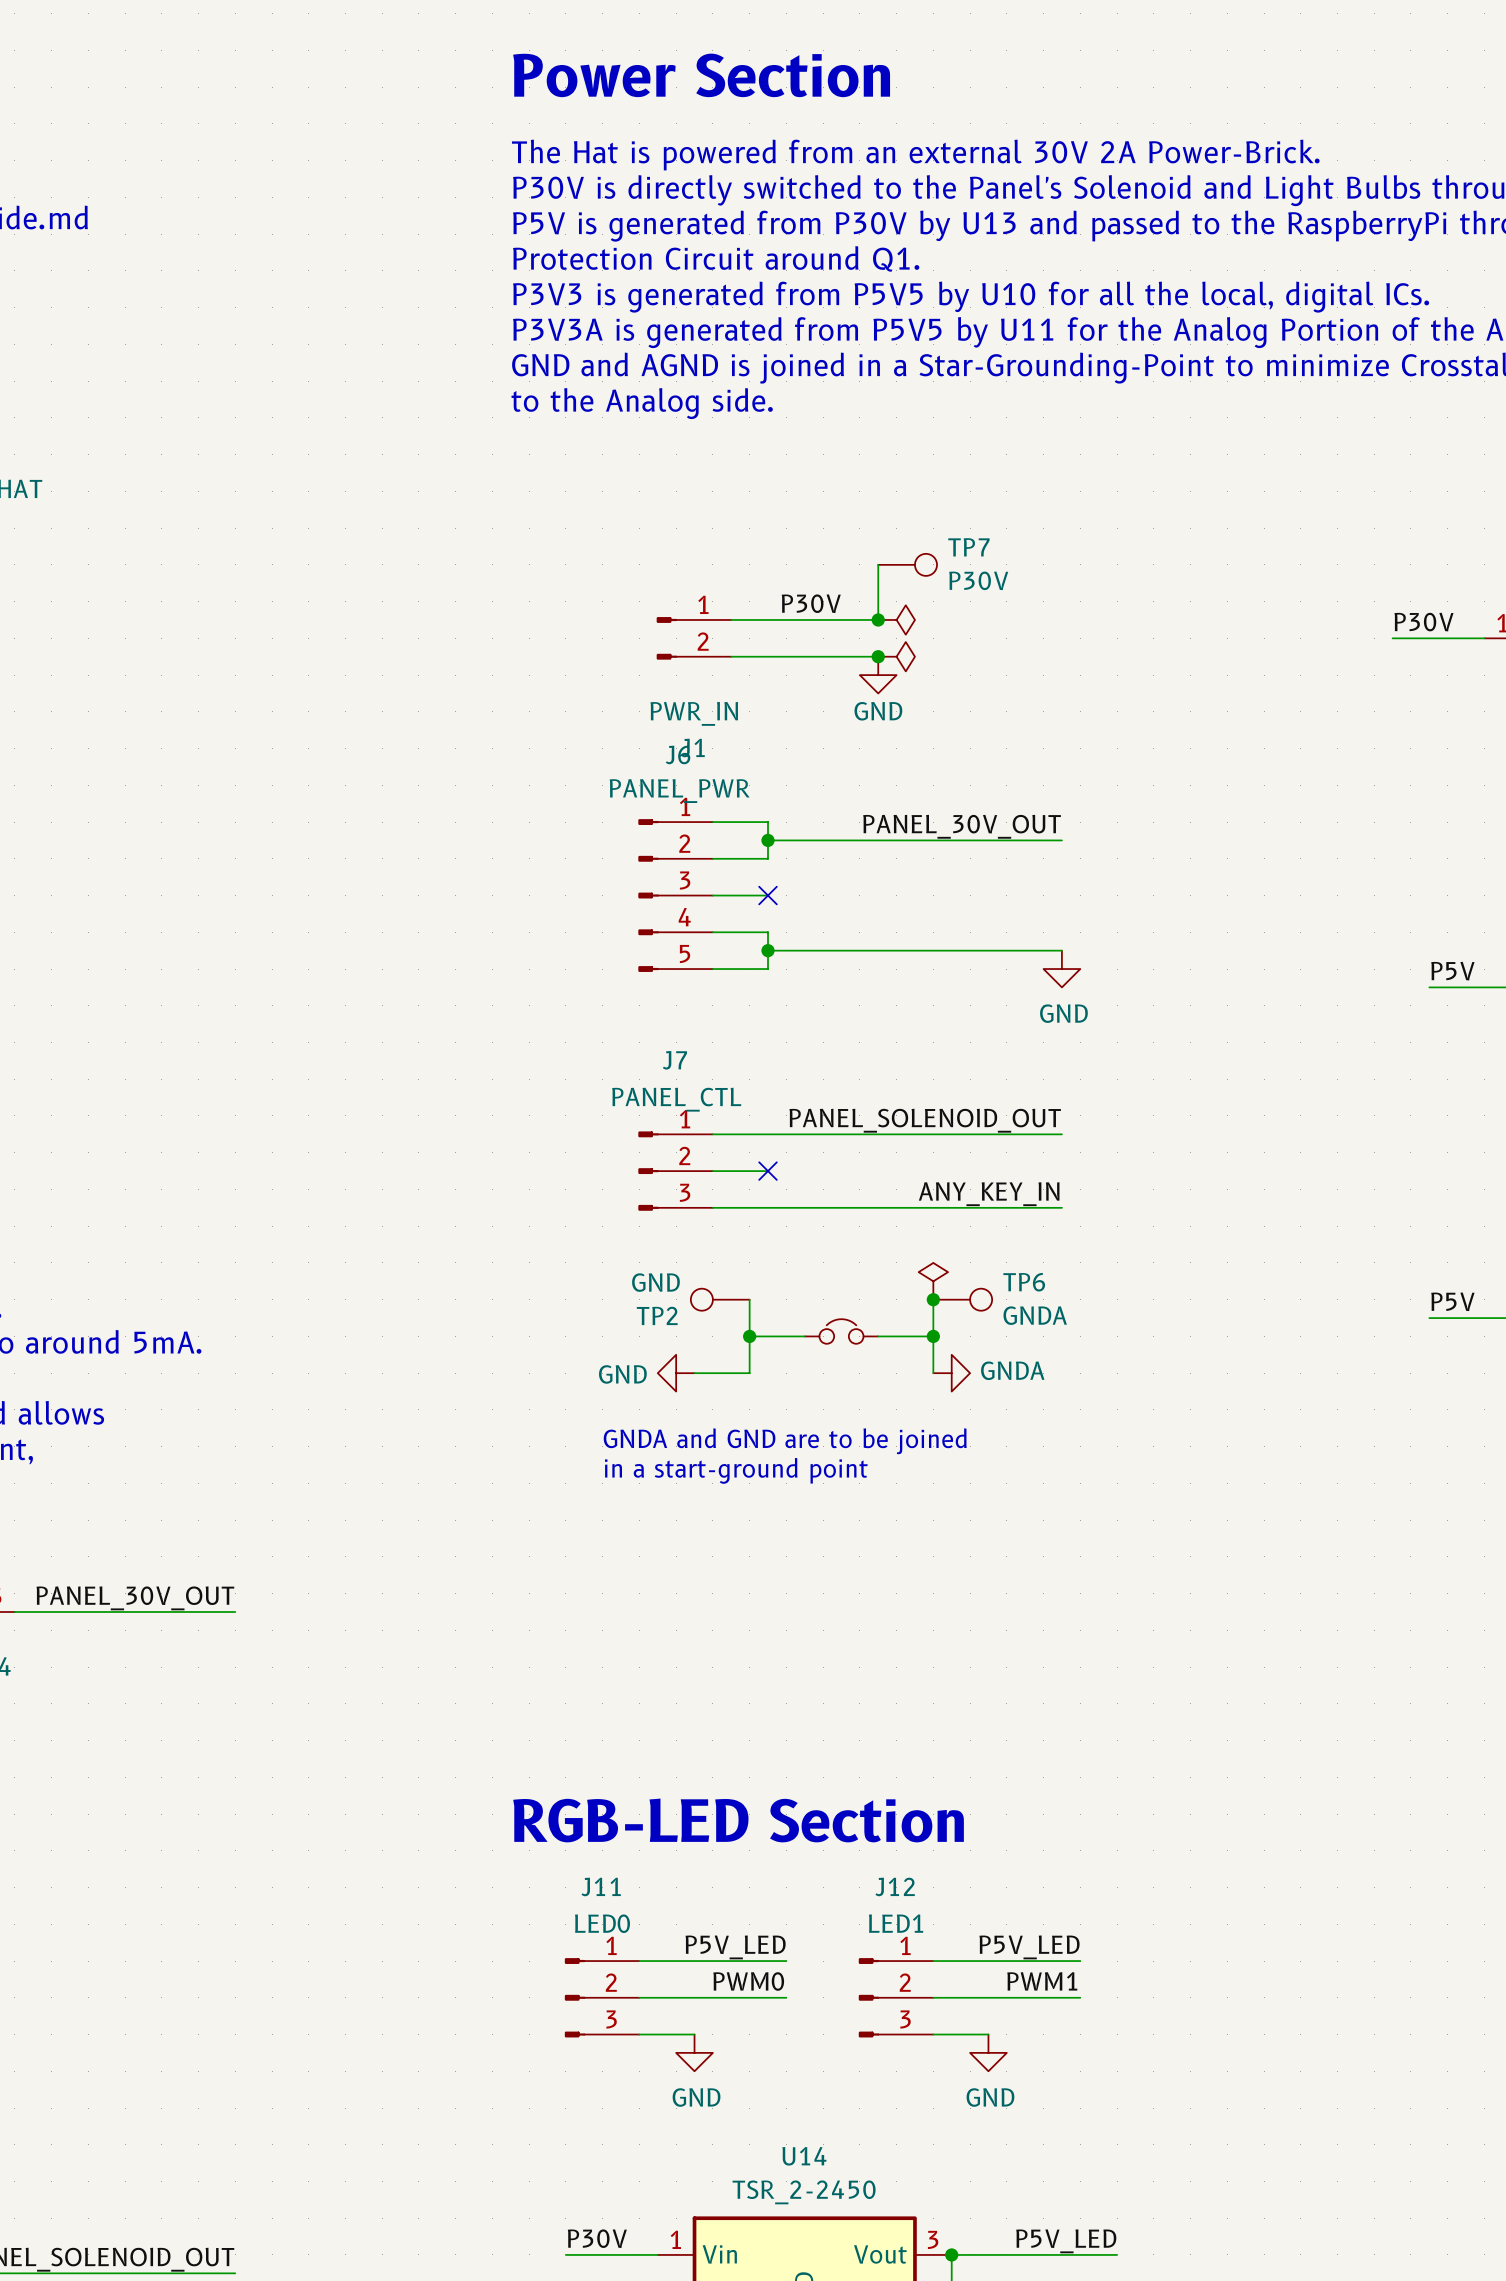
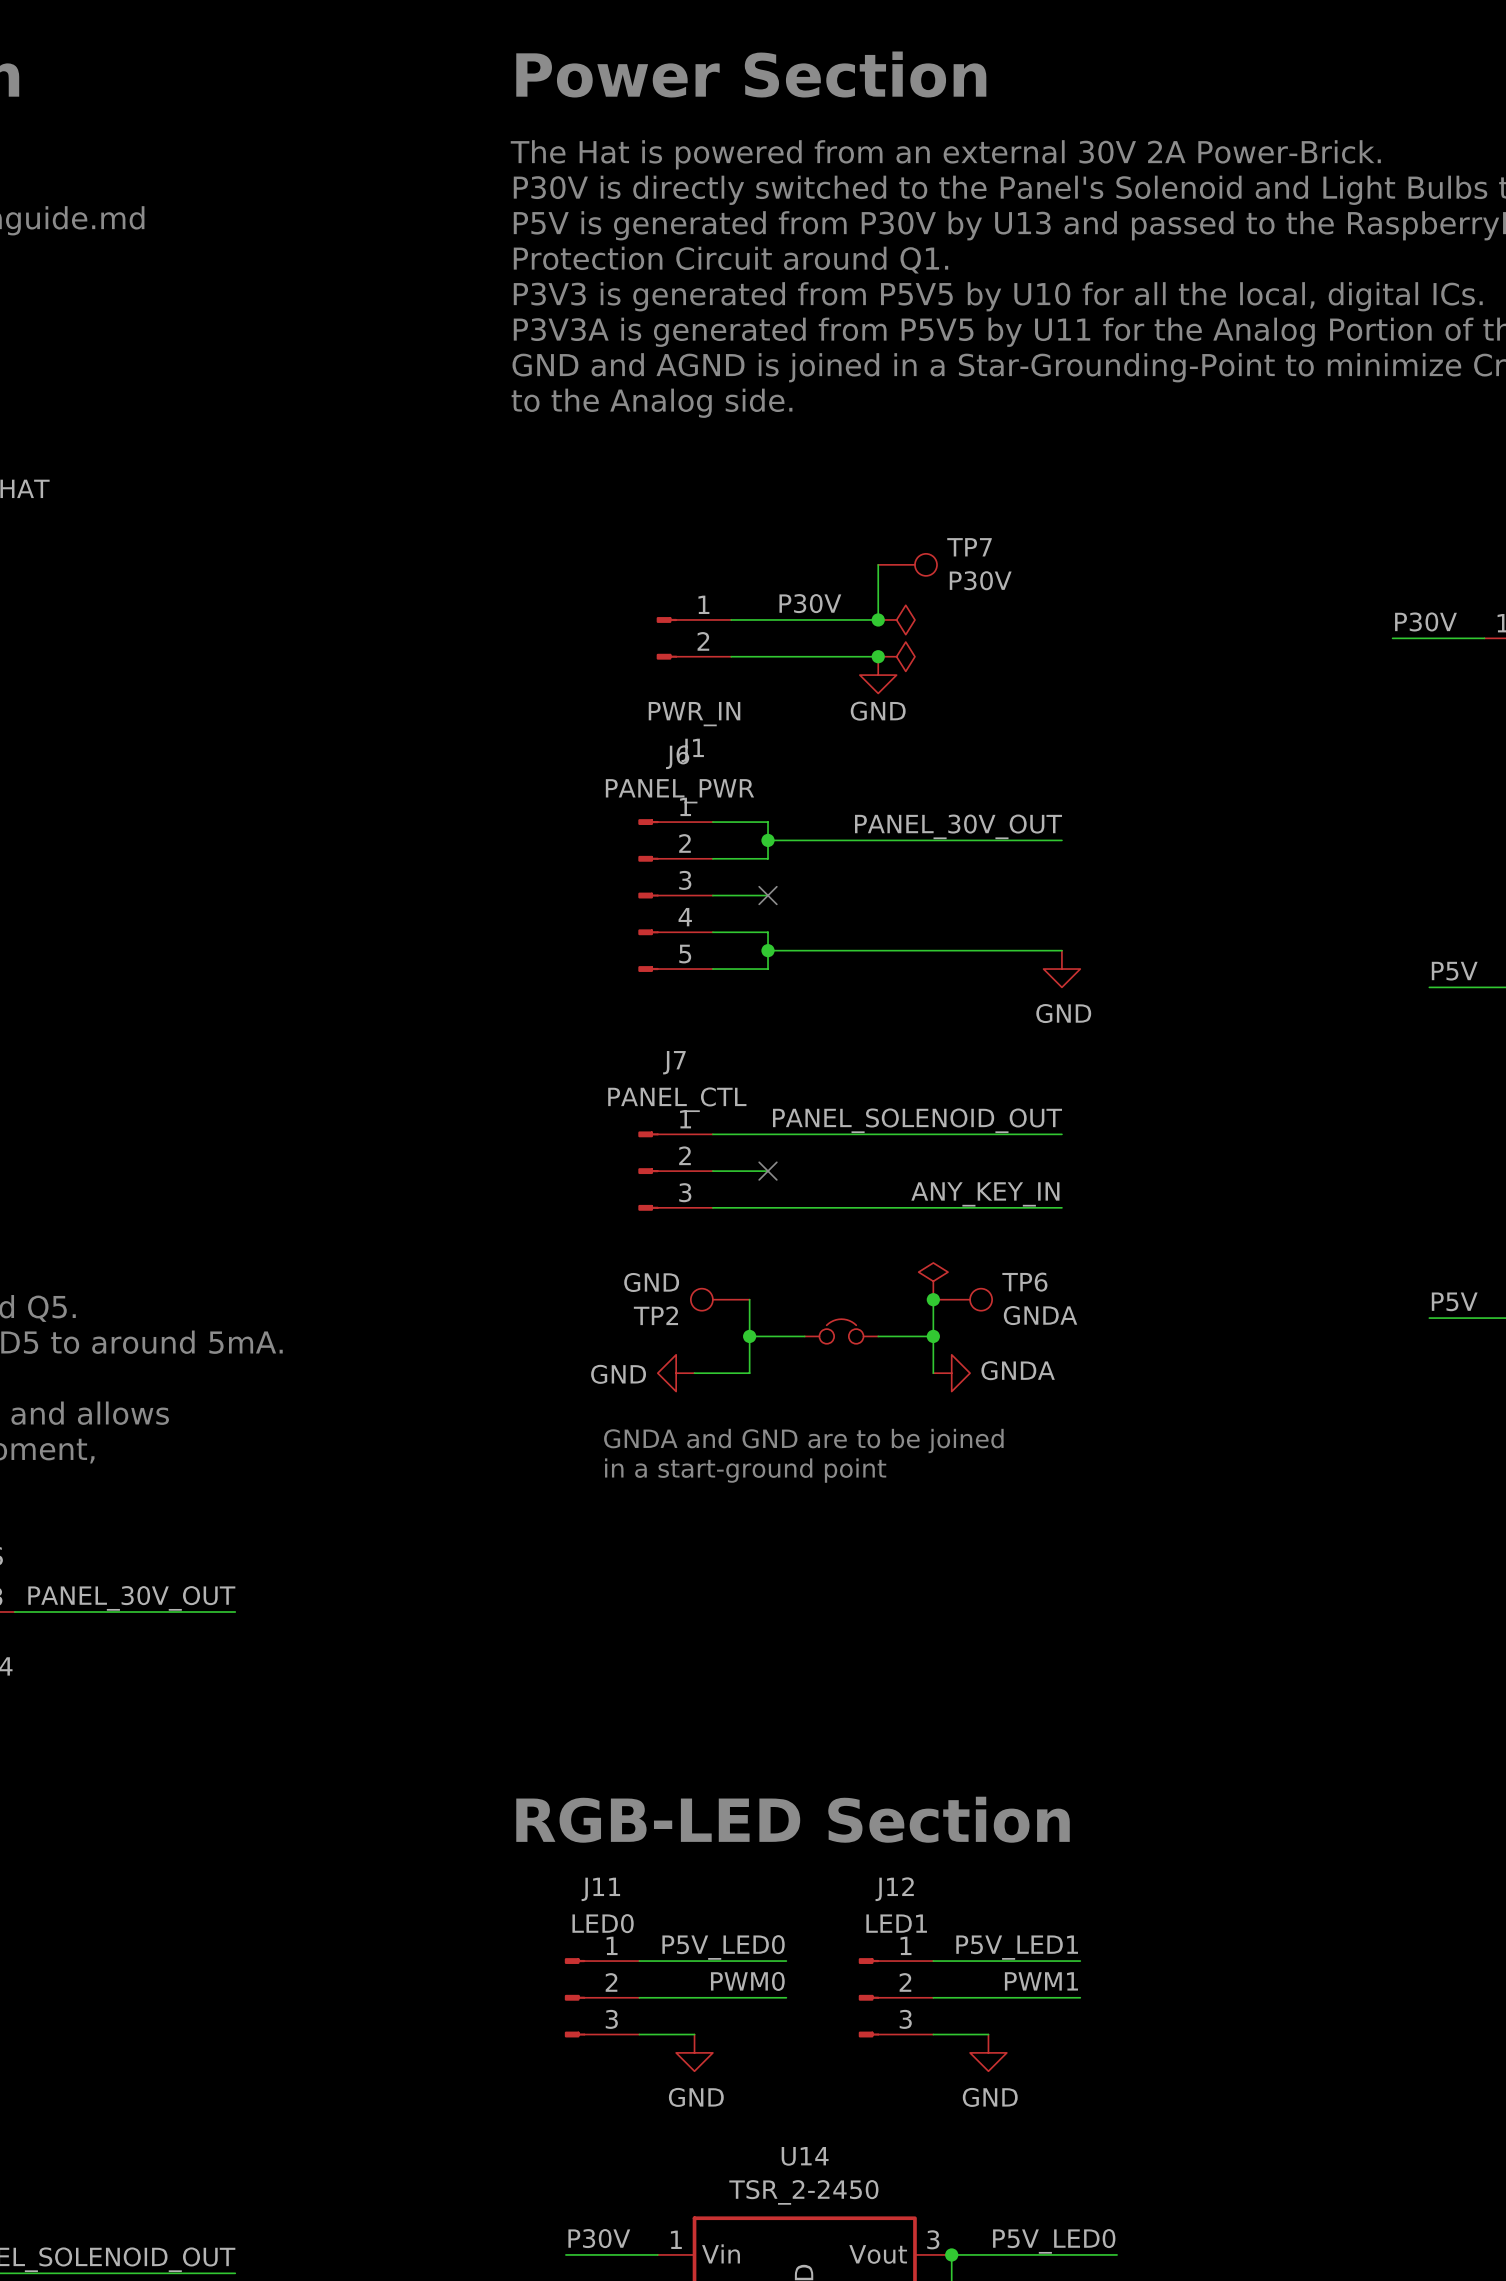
label: P5V_LED (735, 1947) -> P5V_LED0 (723, 1947)
label: P5V_LED (1029, 1947) -> P5V_LED1 (1017, 1947)
label: P5V_LED (1066, 2241) -> P5V_LED0 (1054, 2241)

